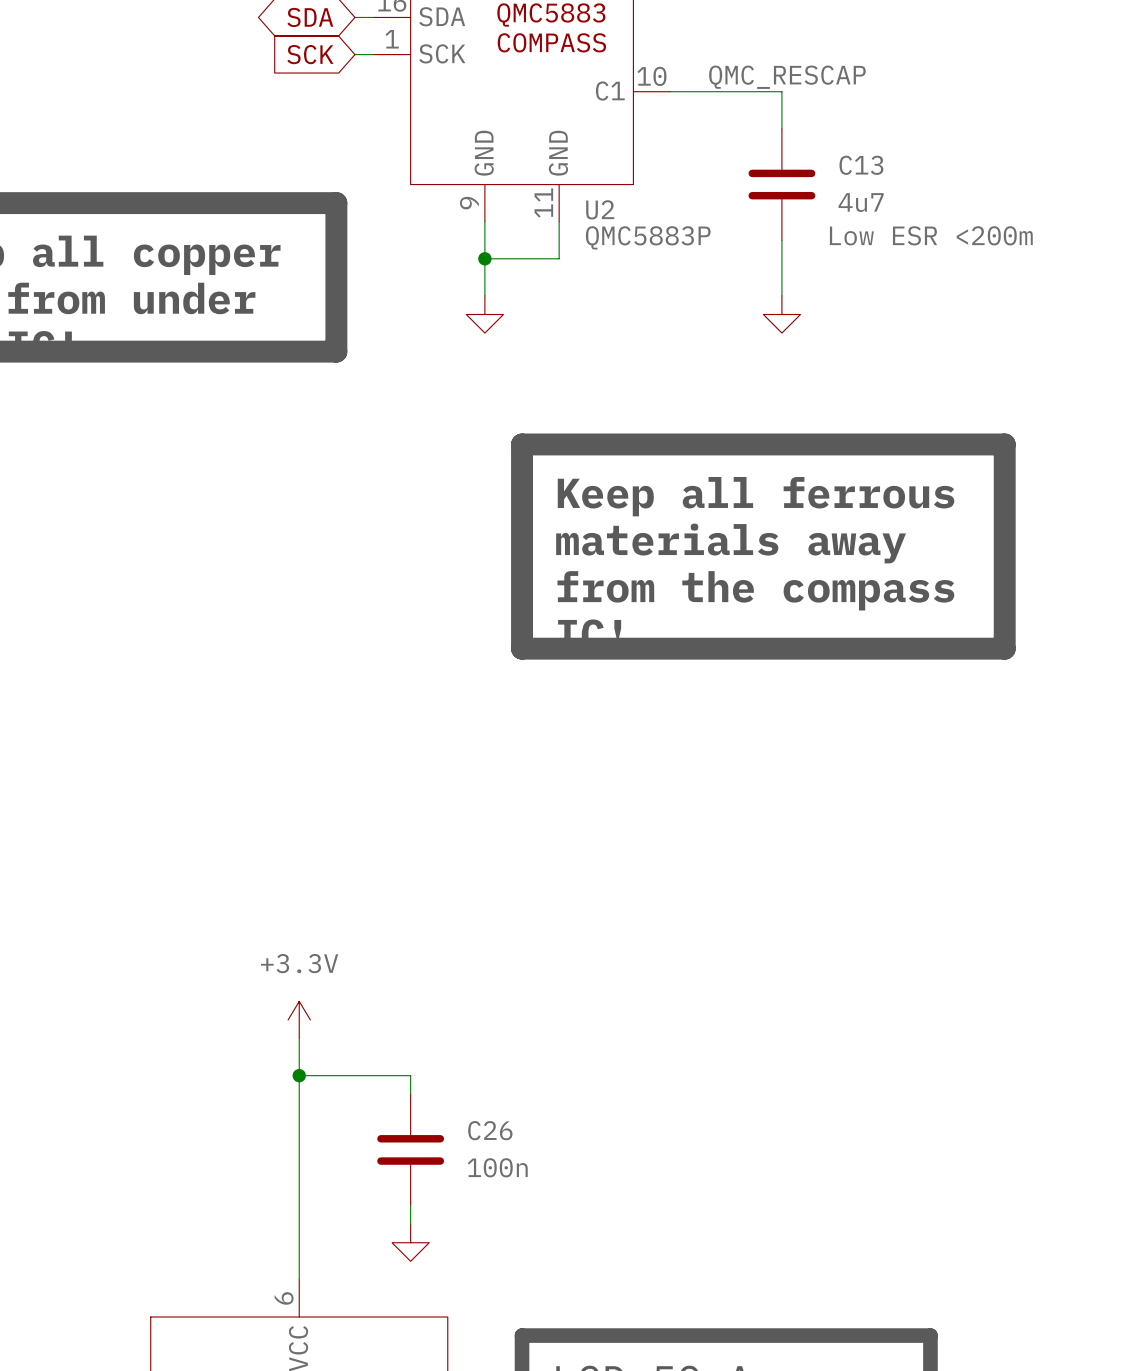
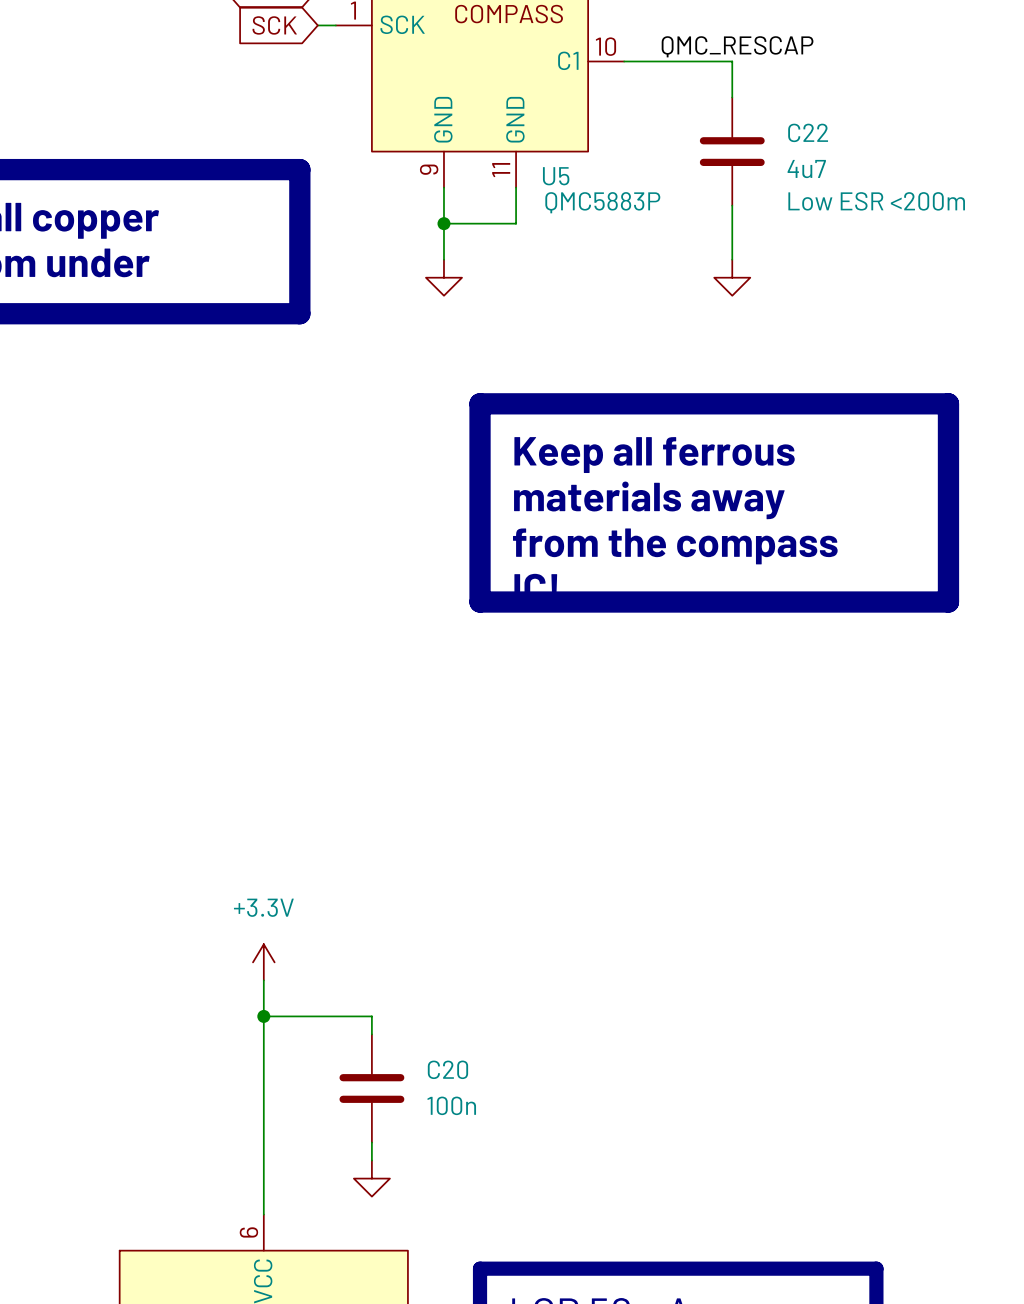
C13 name: C13 (861, 165) -> C22 (808, 132)
U2 name: U2 (600, 209) -> U5 (556, 176)
C26 name: C26 (490, 1130) -> C20 (447, 1069)

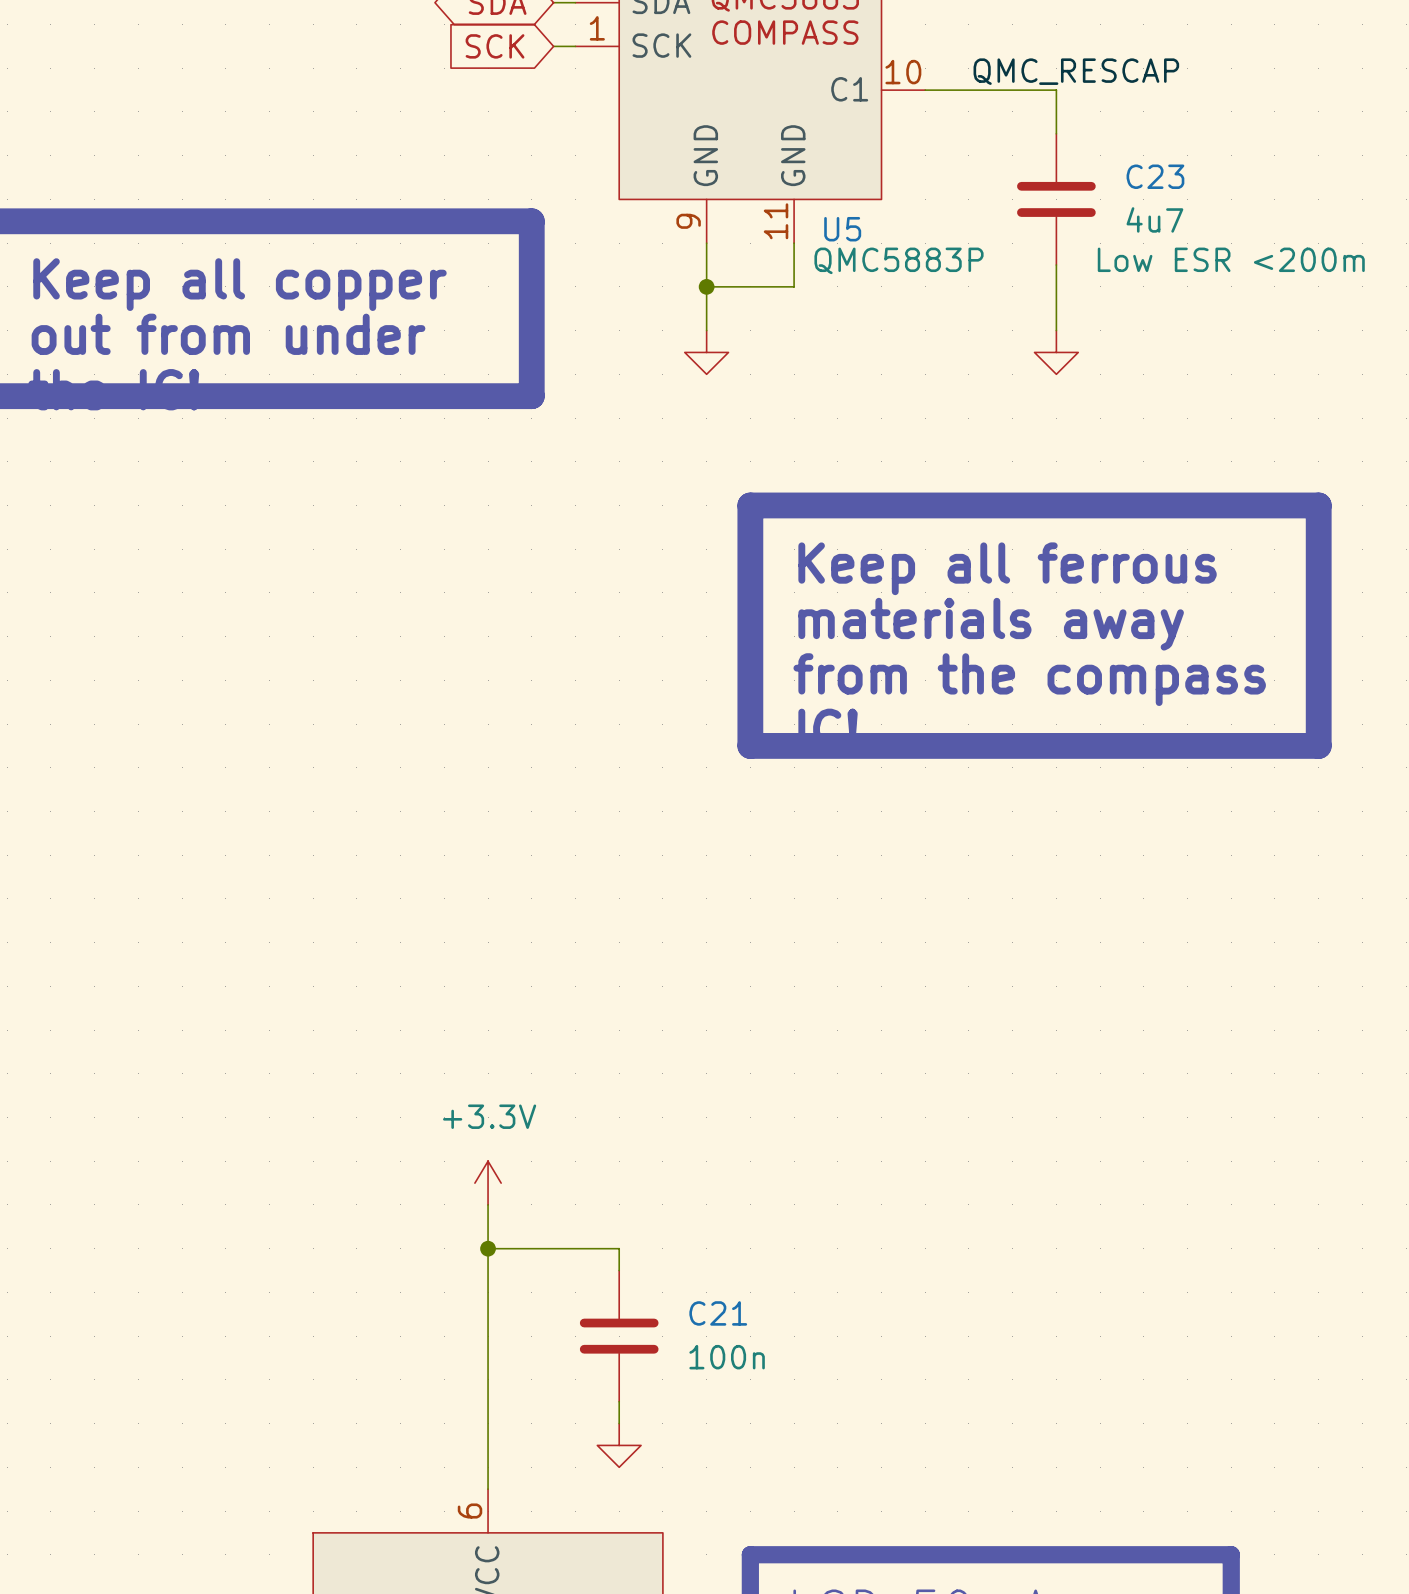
C22 name: C22 (808, 132) -> C23 (1155, 176)
C20 name: C20 (447, 1069) -> C21 (718, 1313)

